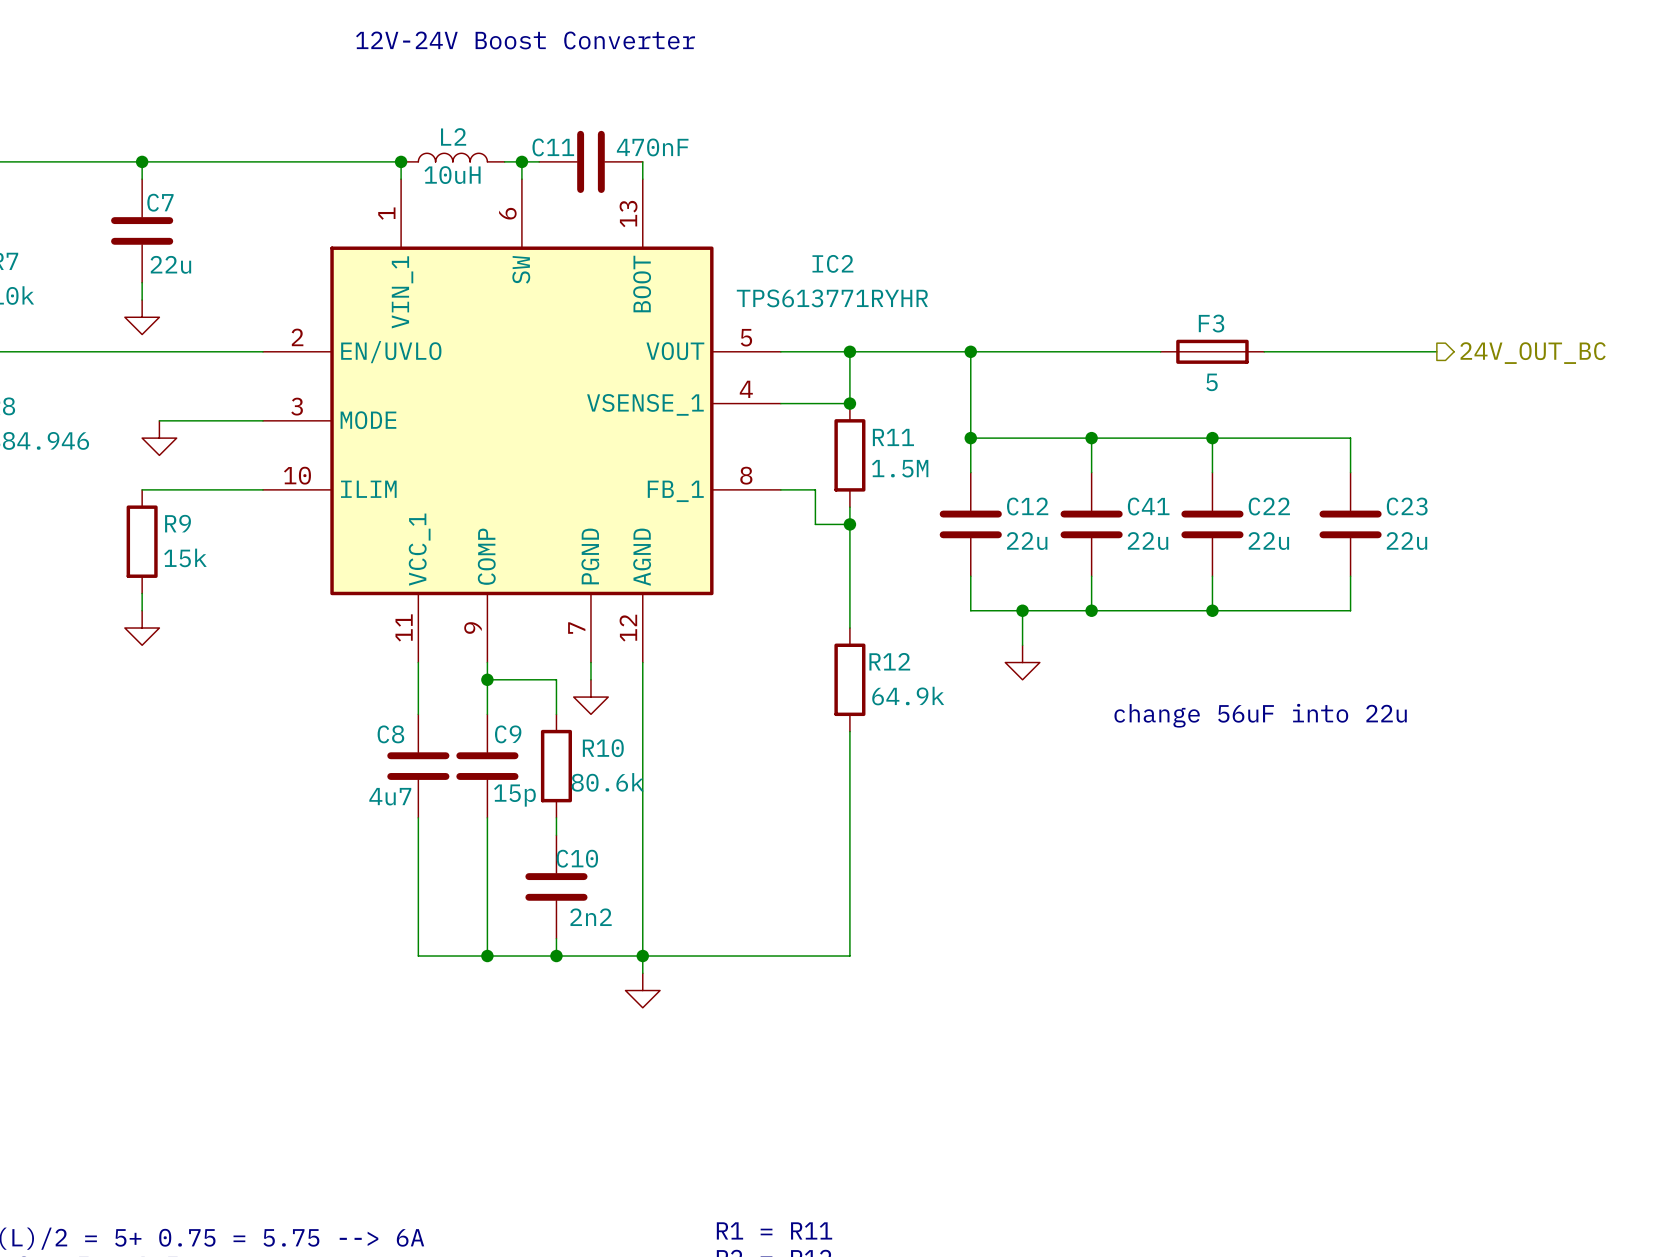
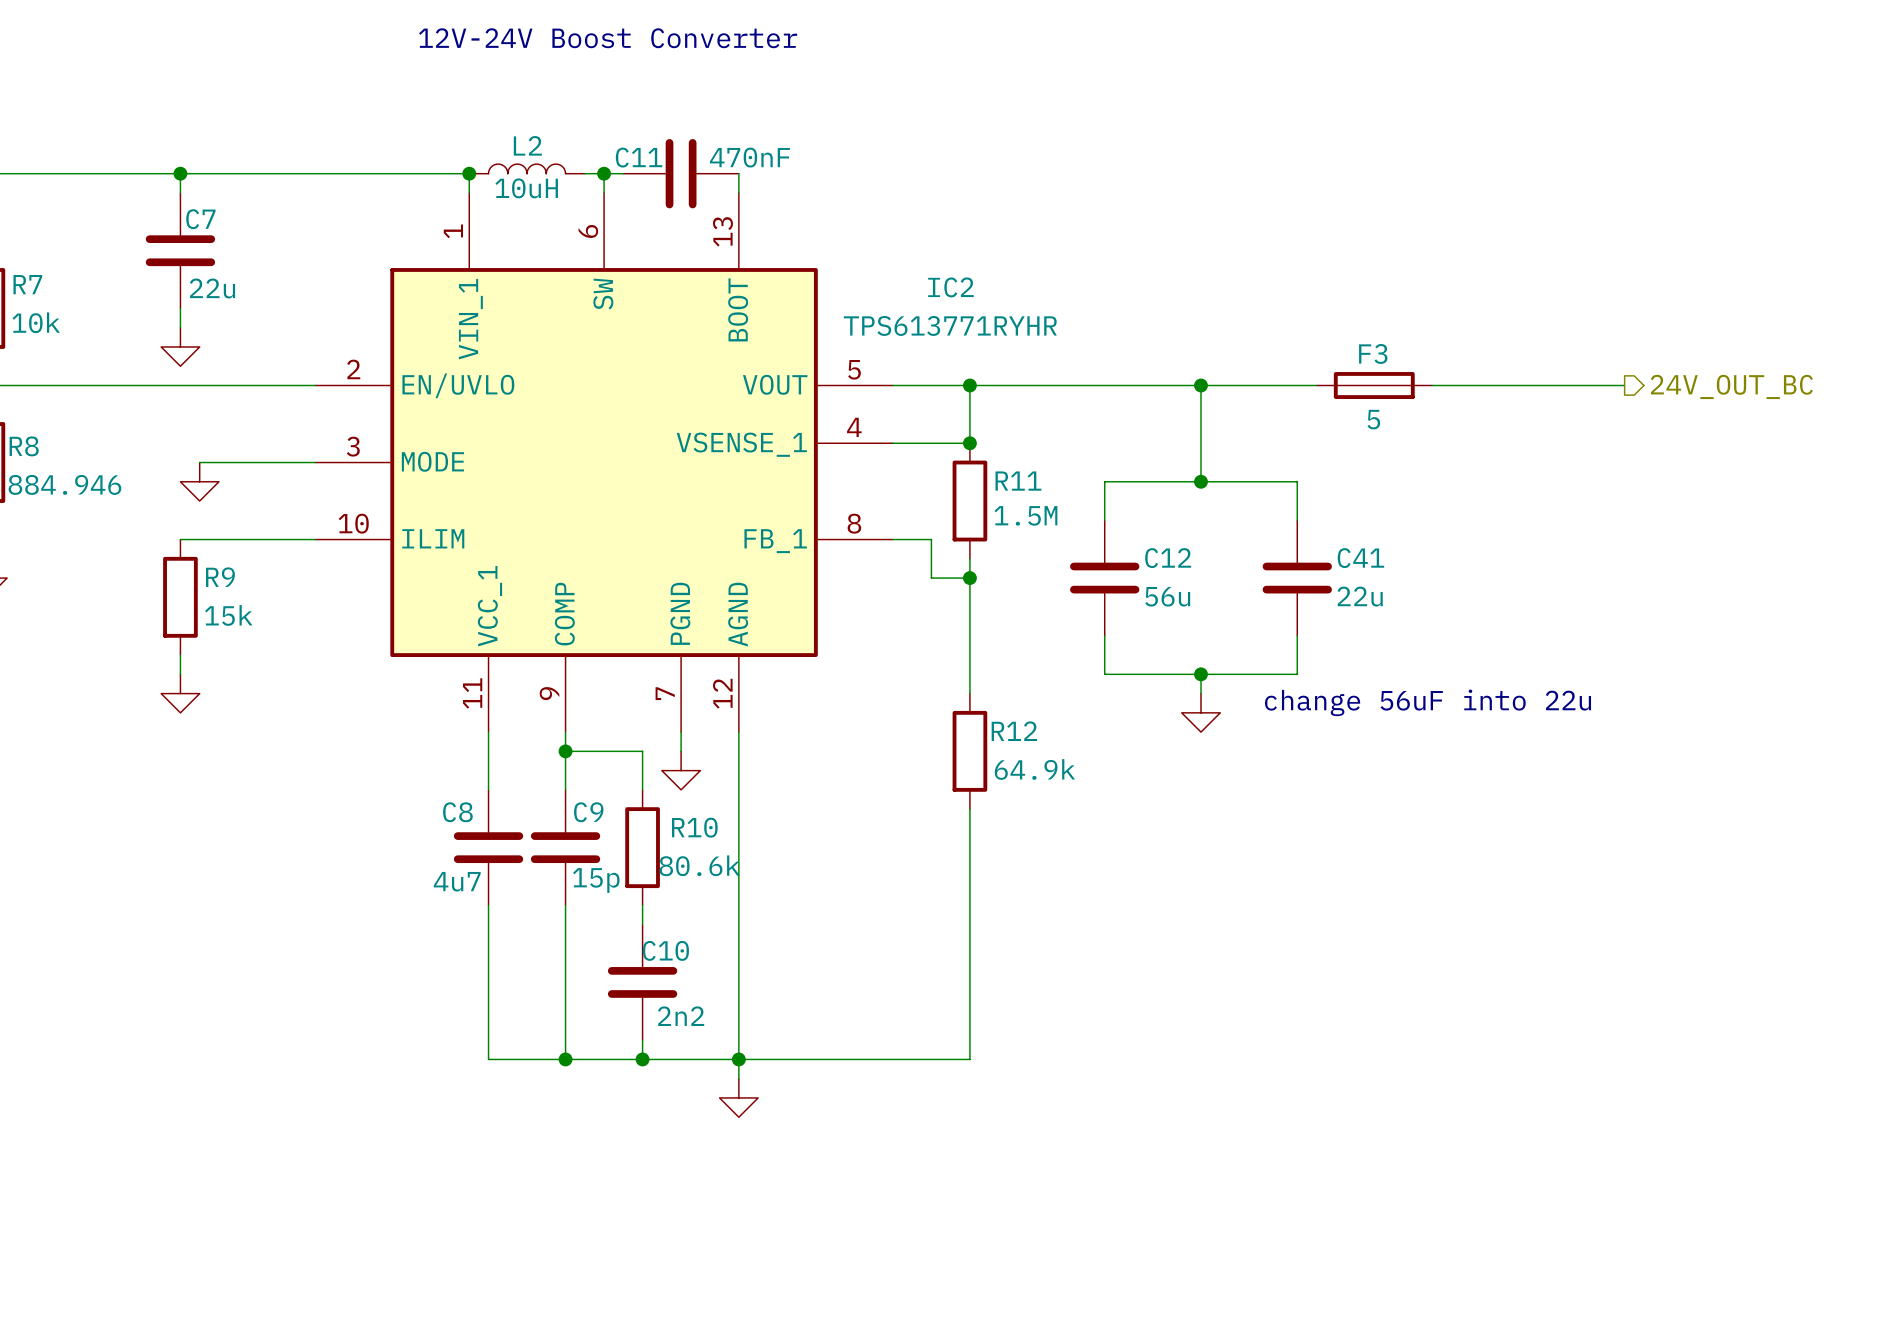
wire: (970, 351) (970, 438) -> (1200, 385) (1200, 481)
junction: (970, 351) -> none
junction: none -> (1200, 385)
junction: (970, 438) -> none
wire: (1091, 438) (1091, 472) -> none
junction position: (1091, 438) -> (1200, 481)
wire: (1143, 438) (1350, 438) (1350, 472) -> (1297, 481) (1297, 520)
wire: (1212, 438) (1212, 472) -> none
junction: (1212, 438) -> none
C41 position: (1091, 524) -> (1297, 578)
C22: 22u (1212, 524) -> none
C23: 22u (1350, 524) -> none
C12 value: 22u (1027, 541) -> 56u (1167, 596)
wire: (1091, 576) (1091, 610) -> none
wire: (1212, 576) (1212, 610) -> none
wire: (1350, 576) (1350, 610) (1143, 610) -> (1297, 635) (1297, 674)
wire: (1022, 610) (1022, 645) -> none
junction: (1022, 610) -> none
wire: none -> (1200, 674) (1200, 693)
junction: none -> (1200, 674)
junction: (1091, 610) -> none
junction: (1212, 610) -> none
power symbol position: (1022, 662) -> (1200, 712)
text position: change 56uF into 22u (1260, 715) -> change 56uF into 22u (1428, 702)

